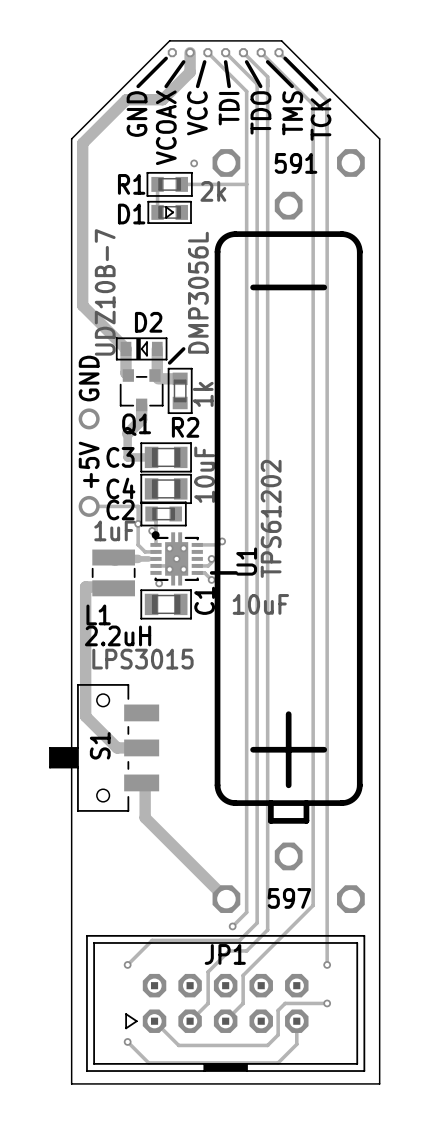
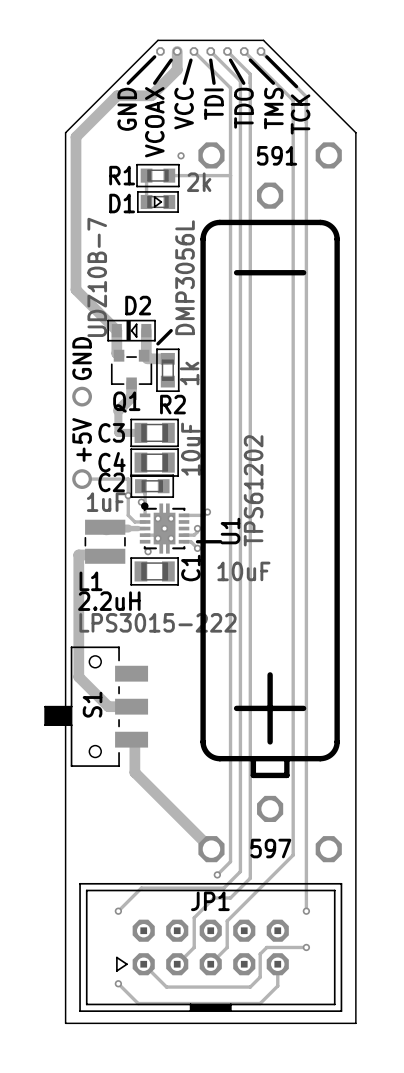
L1 value: LPS3015 (142, 659) -> LPS3015-222 (157, 622)

